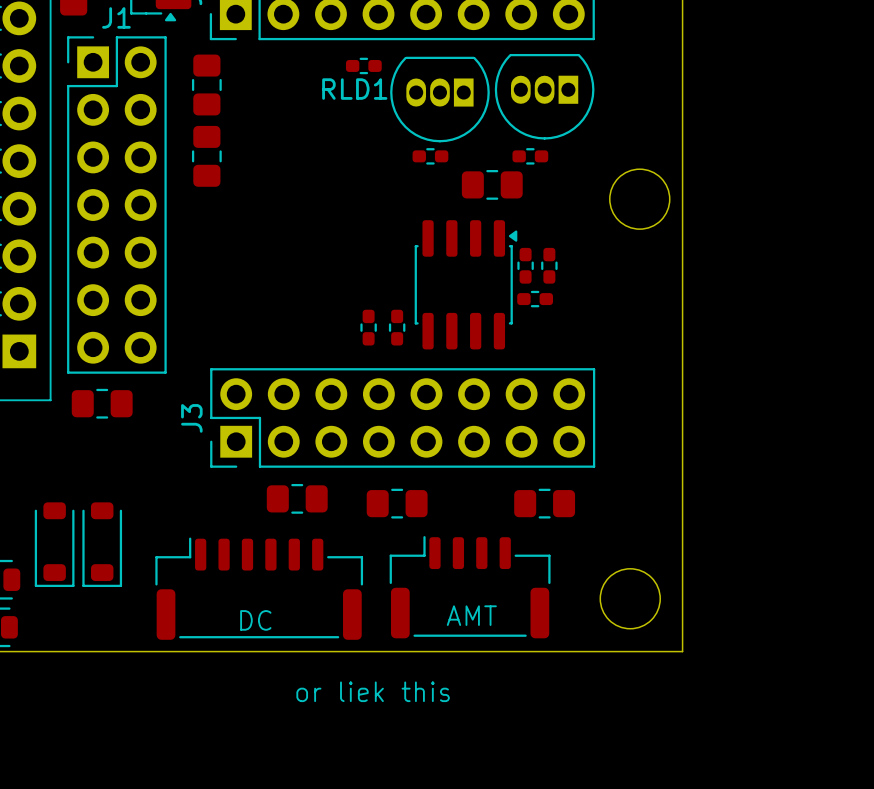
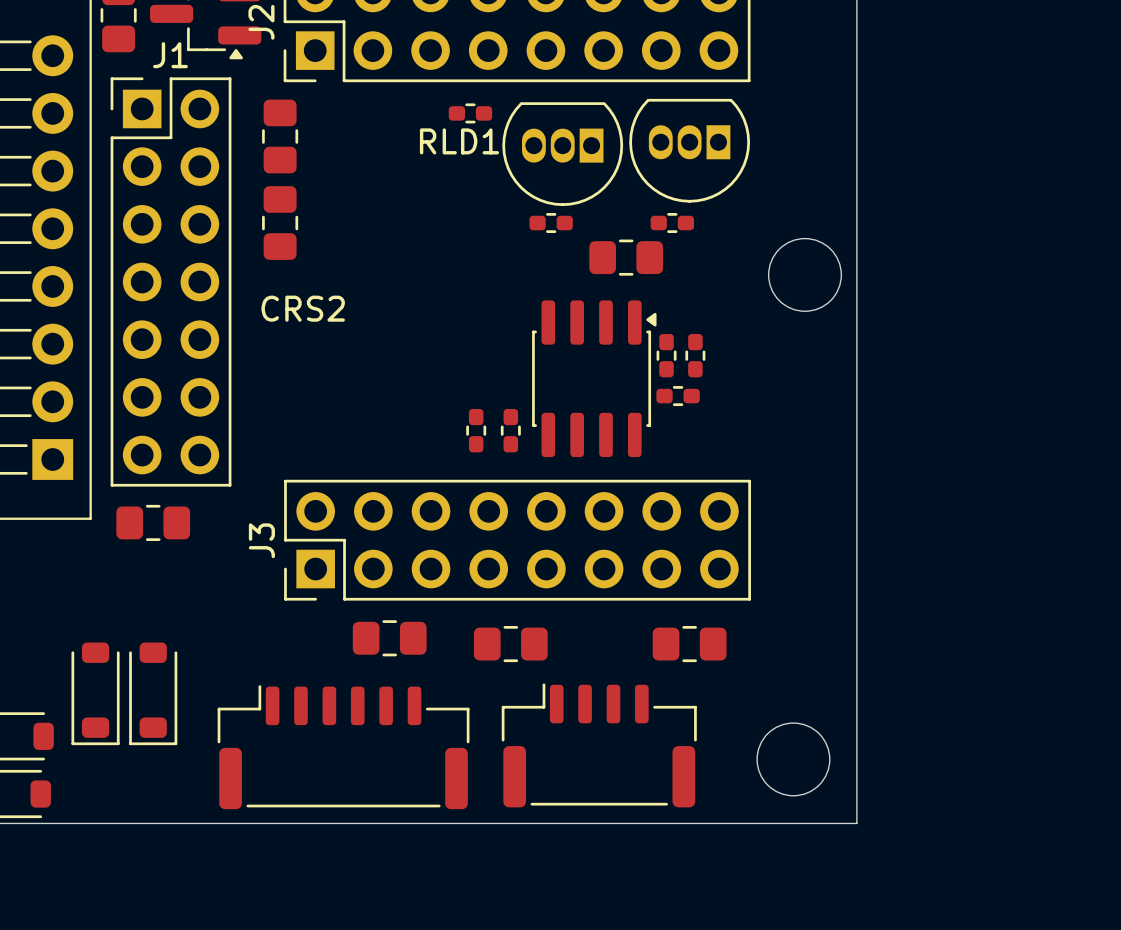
CRS2 name: none -> CRS2 (303, 308)
text: AMT (471, 615) -> none
text: DC (255, 620) -> none
text: or liek this (373, 691) -> none

